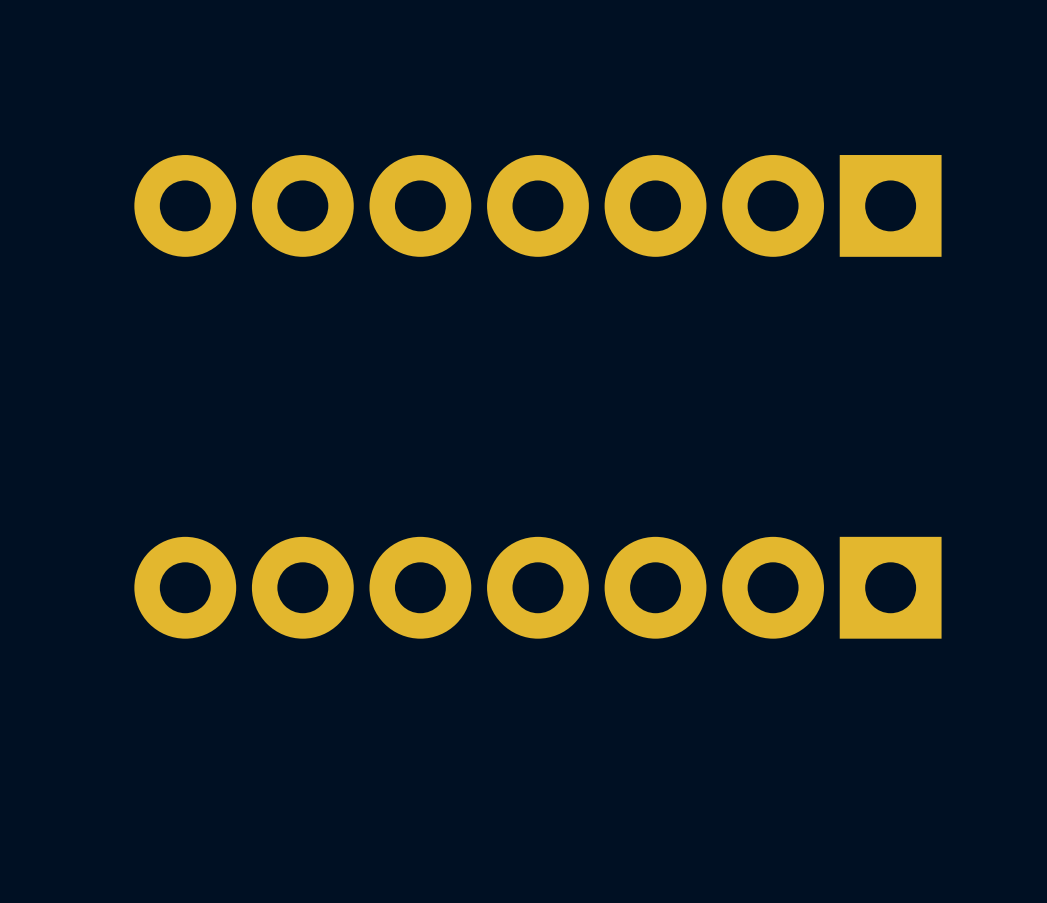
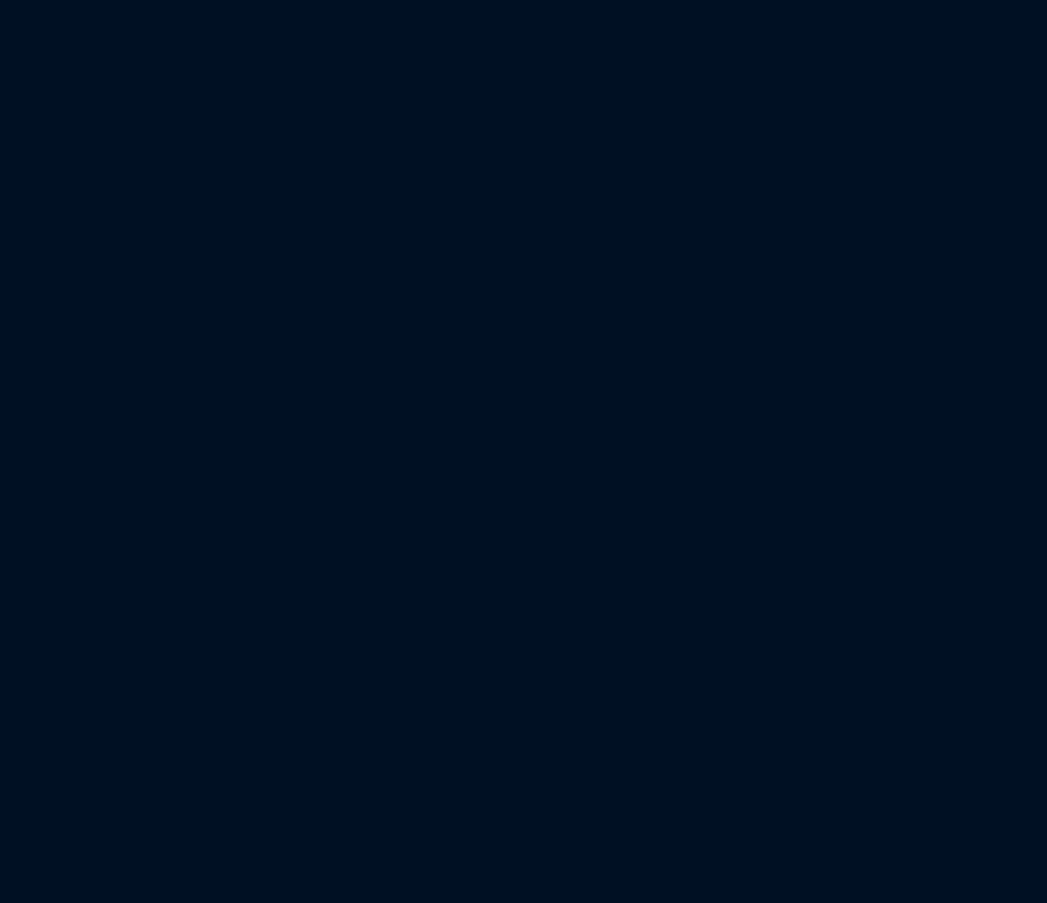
part: (537, 205) -> none
part: (537, 587) -> none

